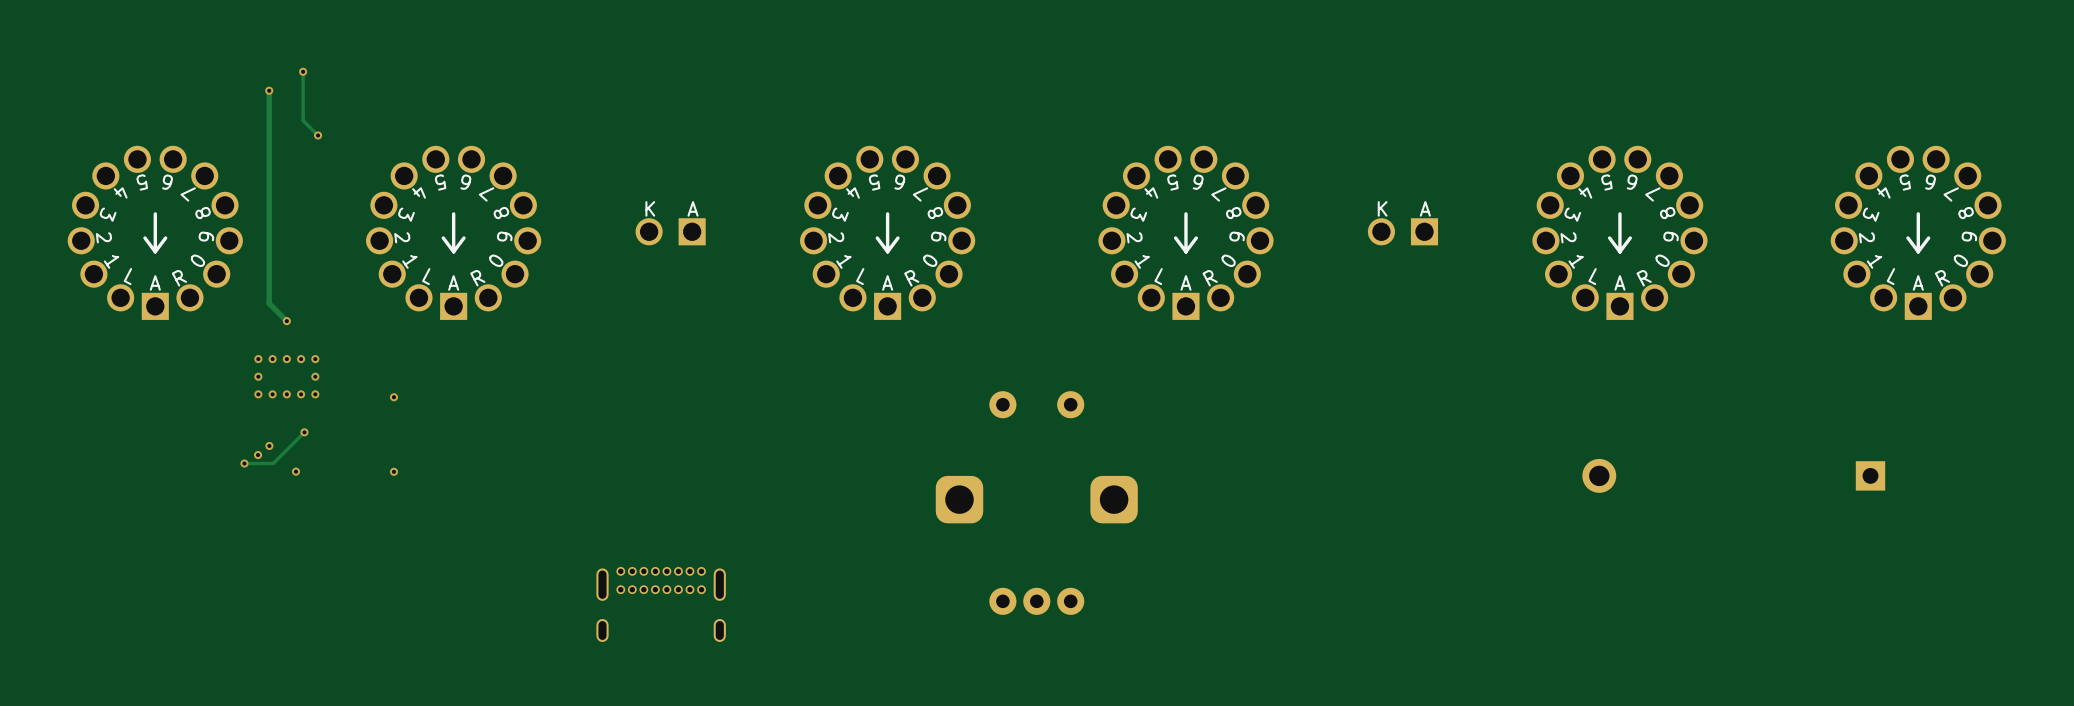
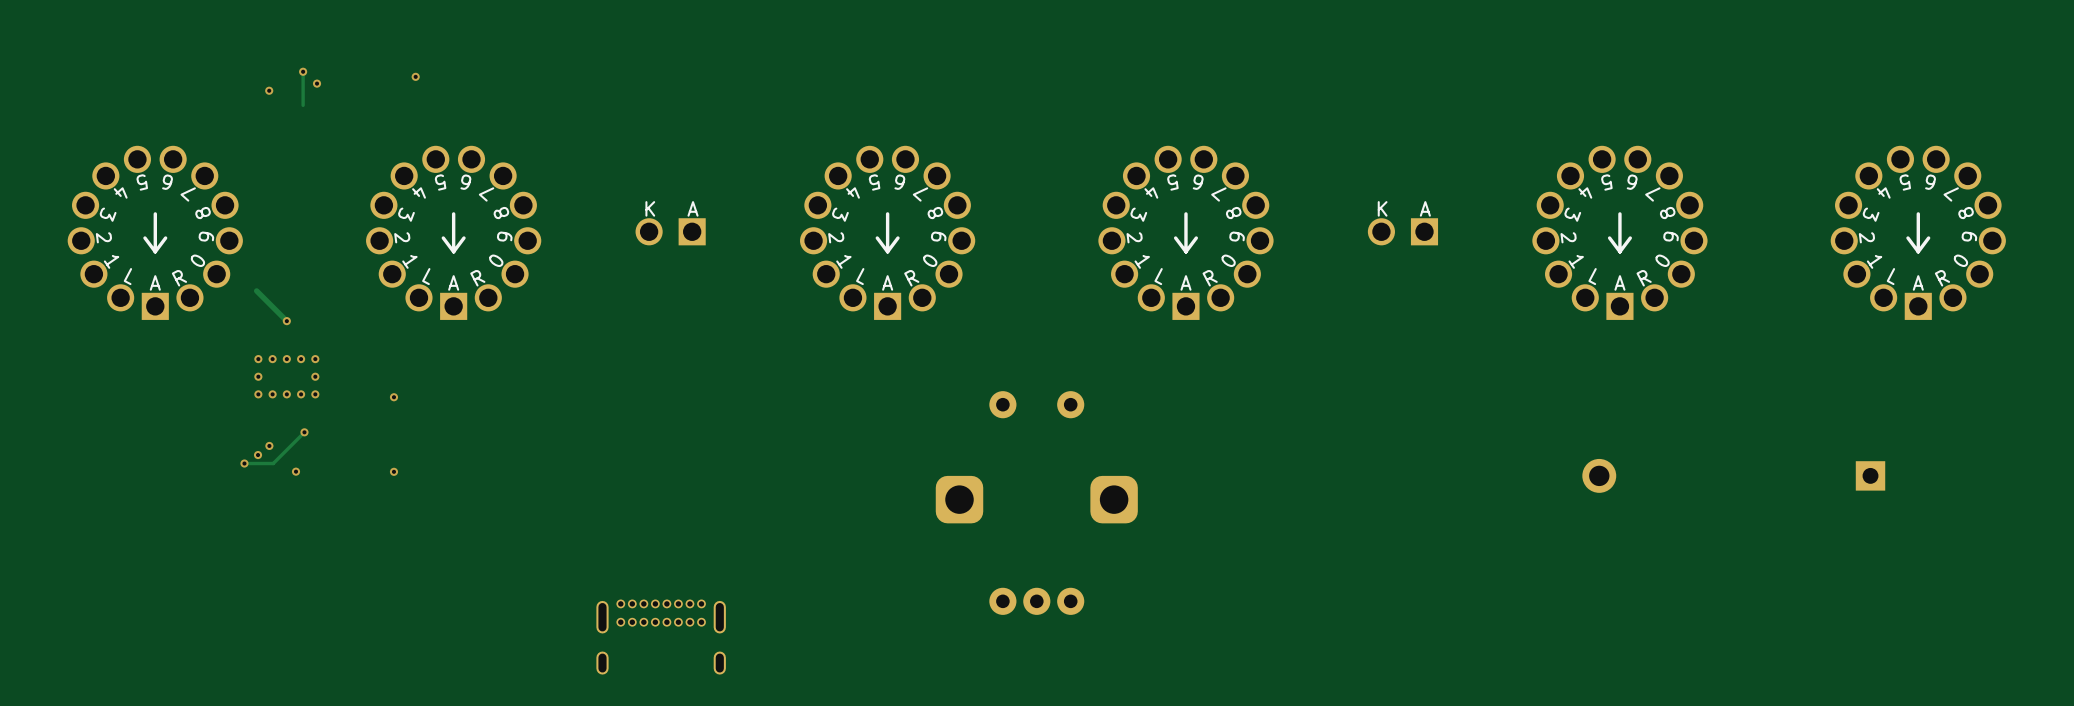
via: none -> (415, 76)
track: (269, 90) (269, 303) -> (256, 290) (269, 303)
track: (303, 105) (303, 120) (318, 135) -> none
via position: (318, 135) -> (317, 83)
part position: (661, 604) -> (661, 637)

